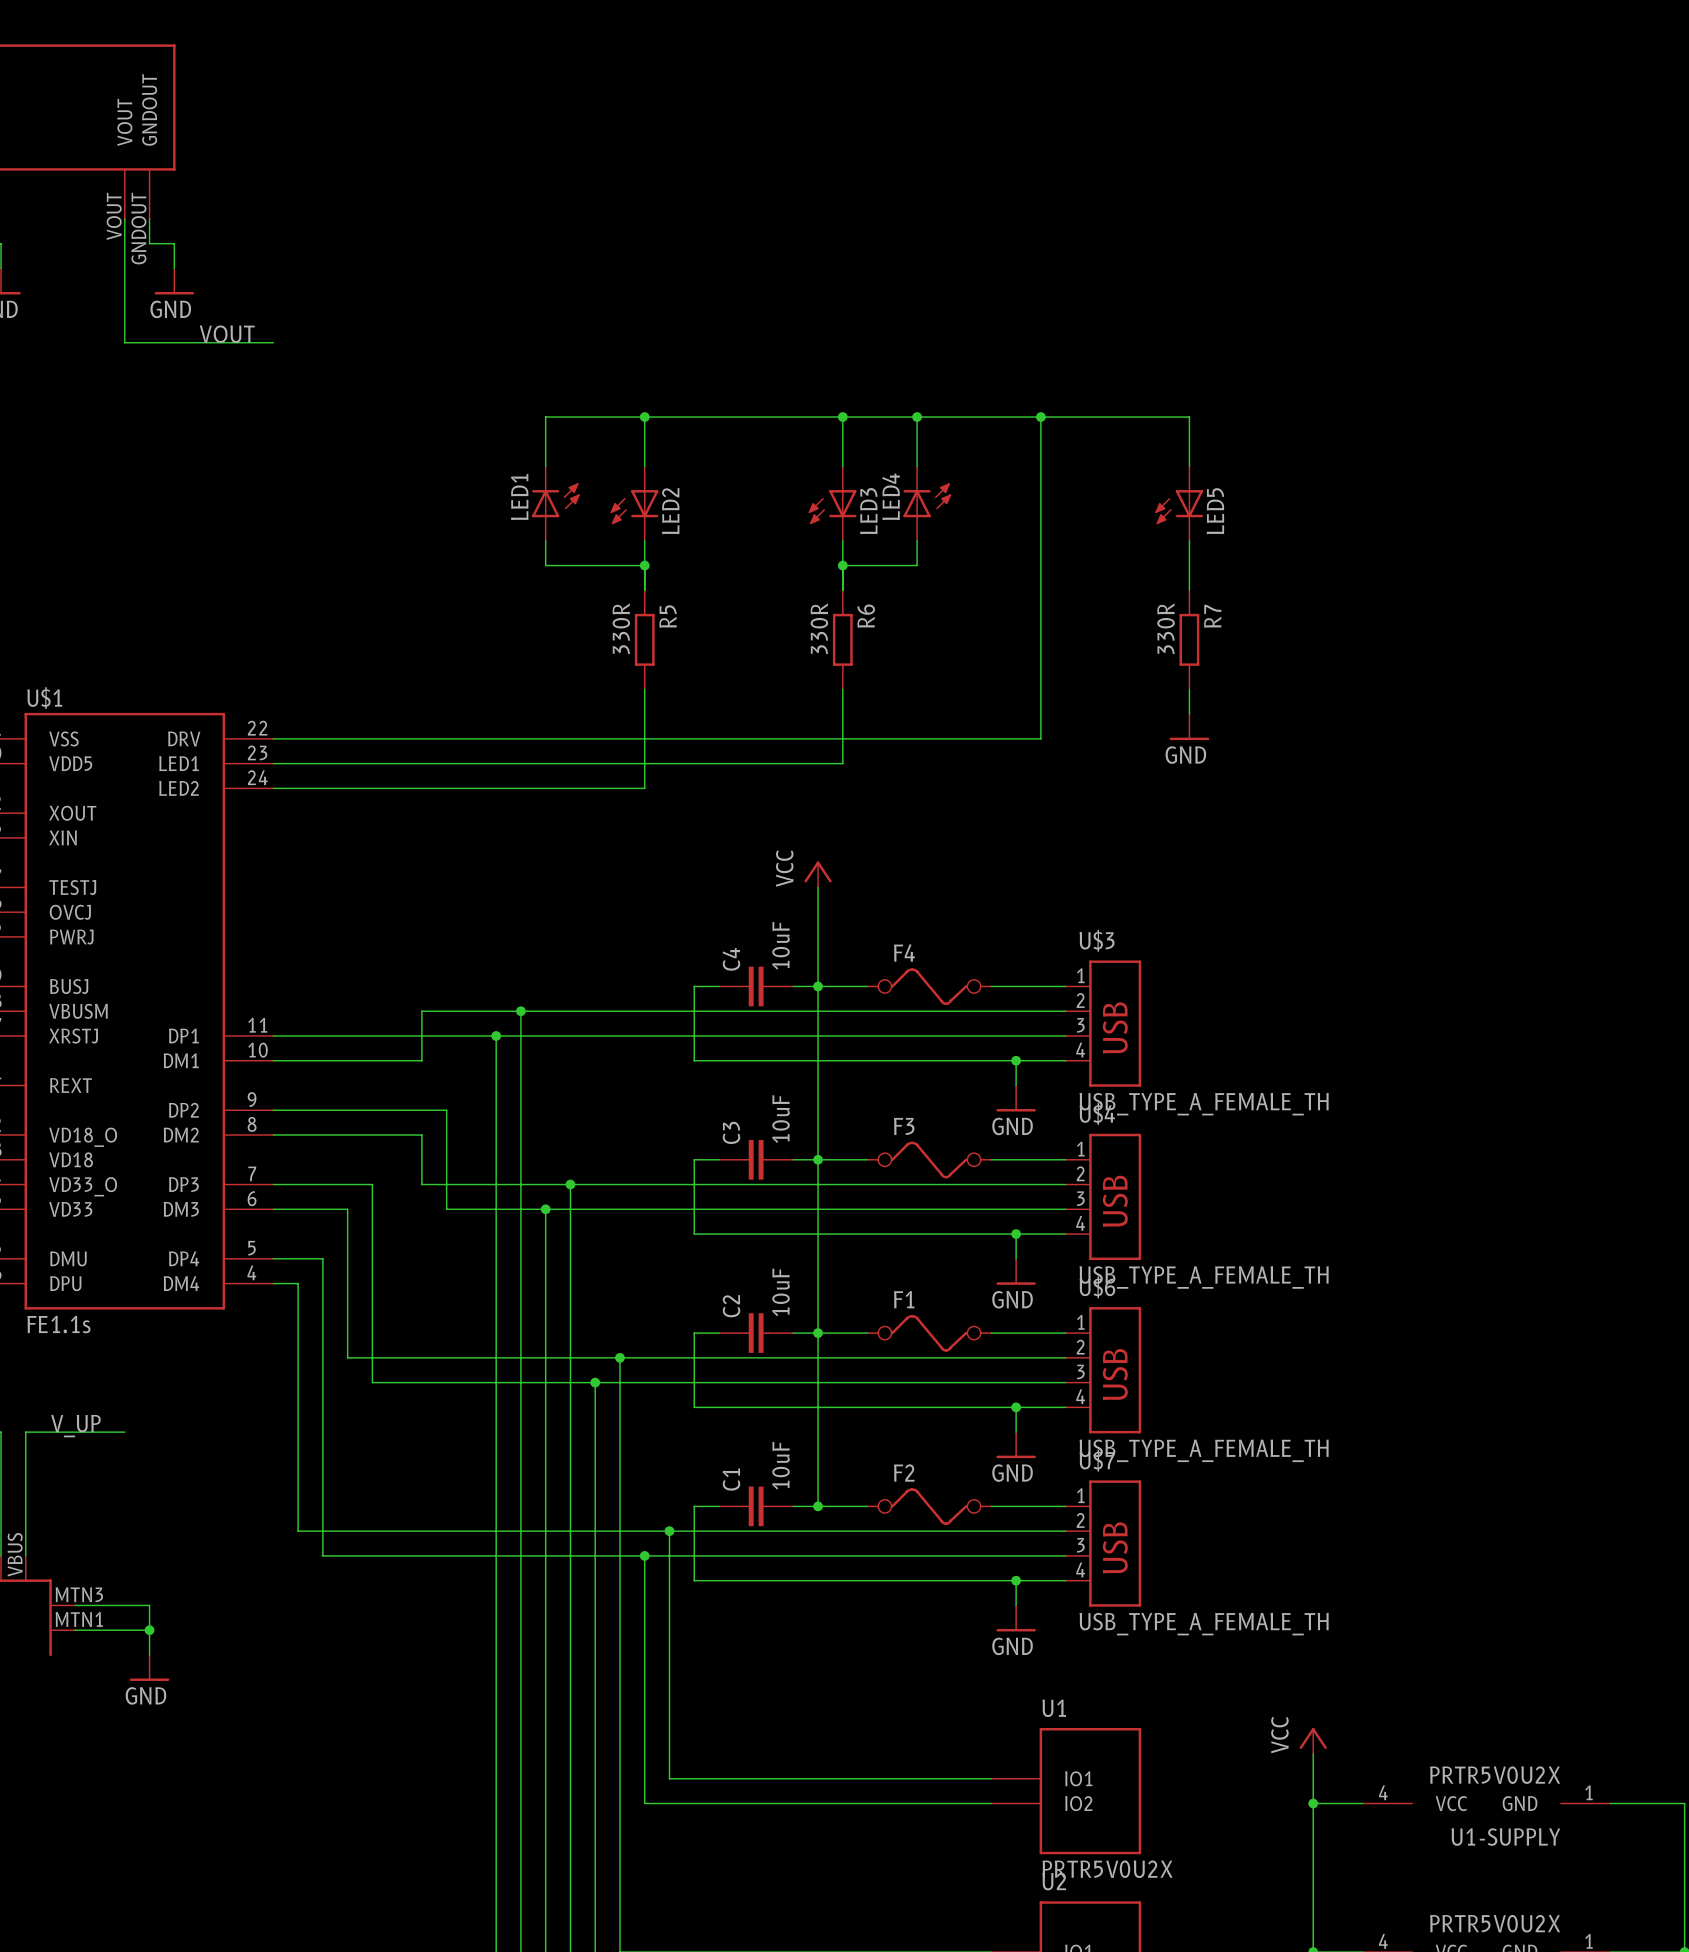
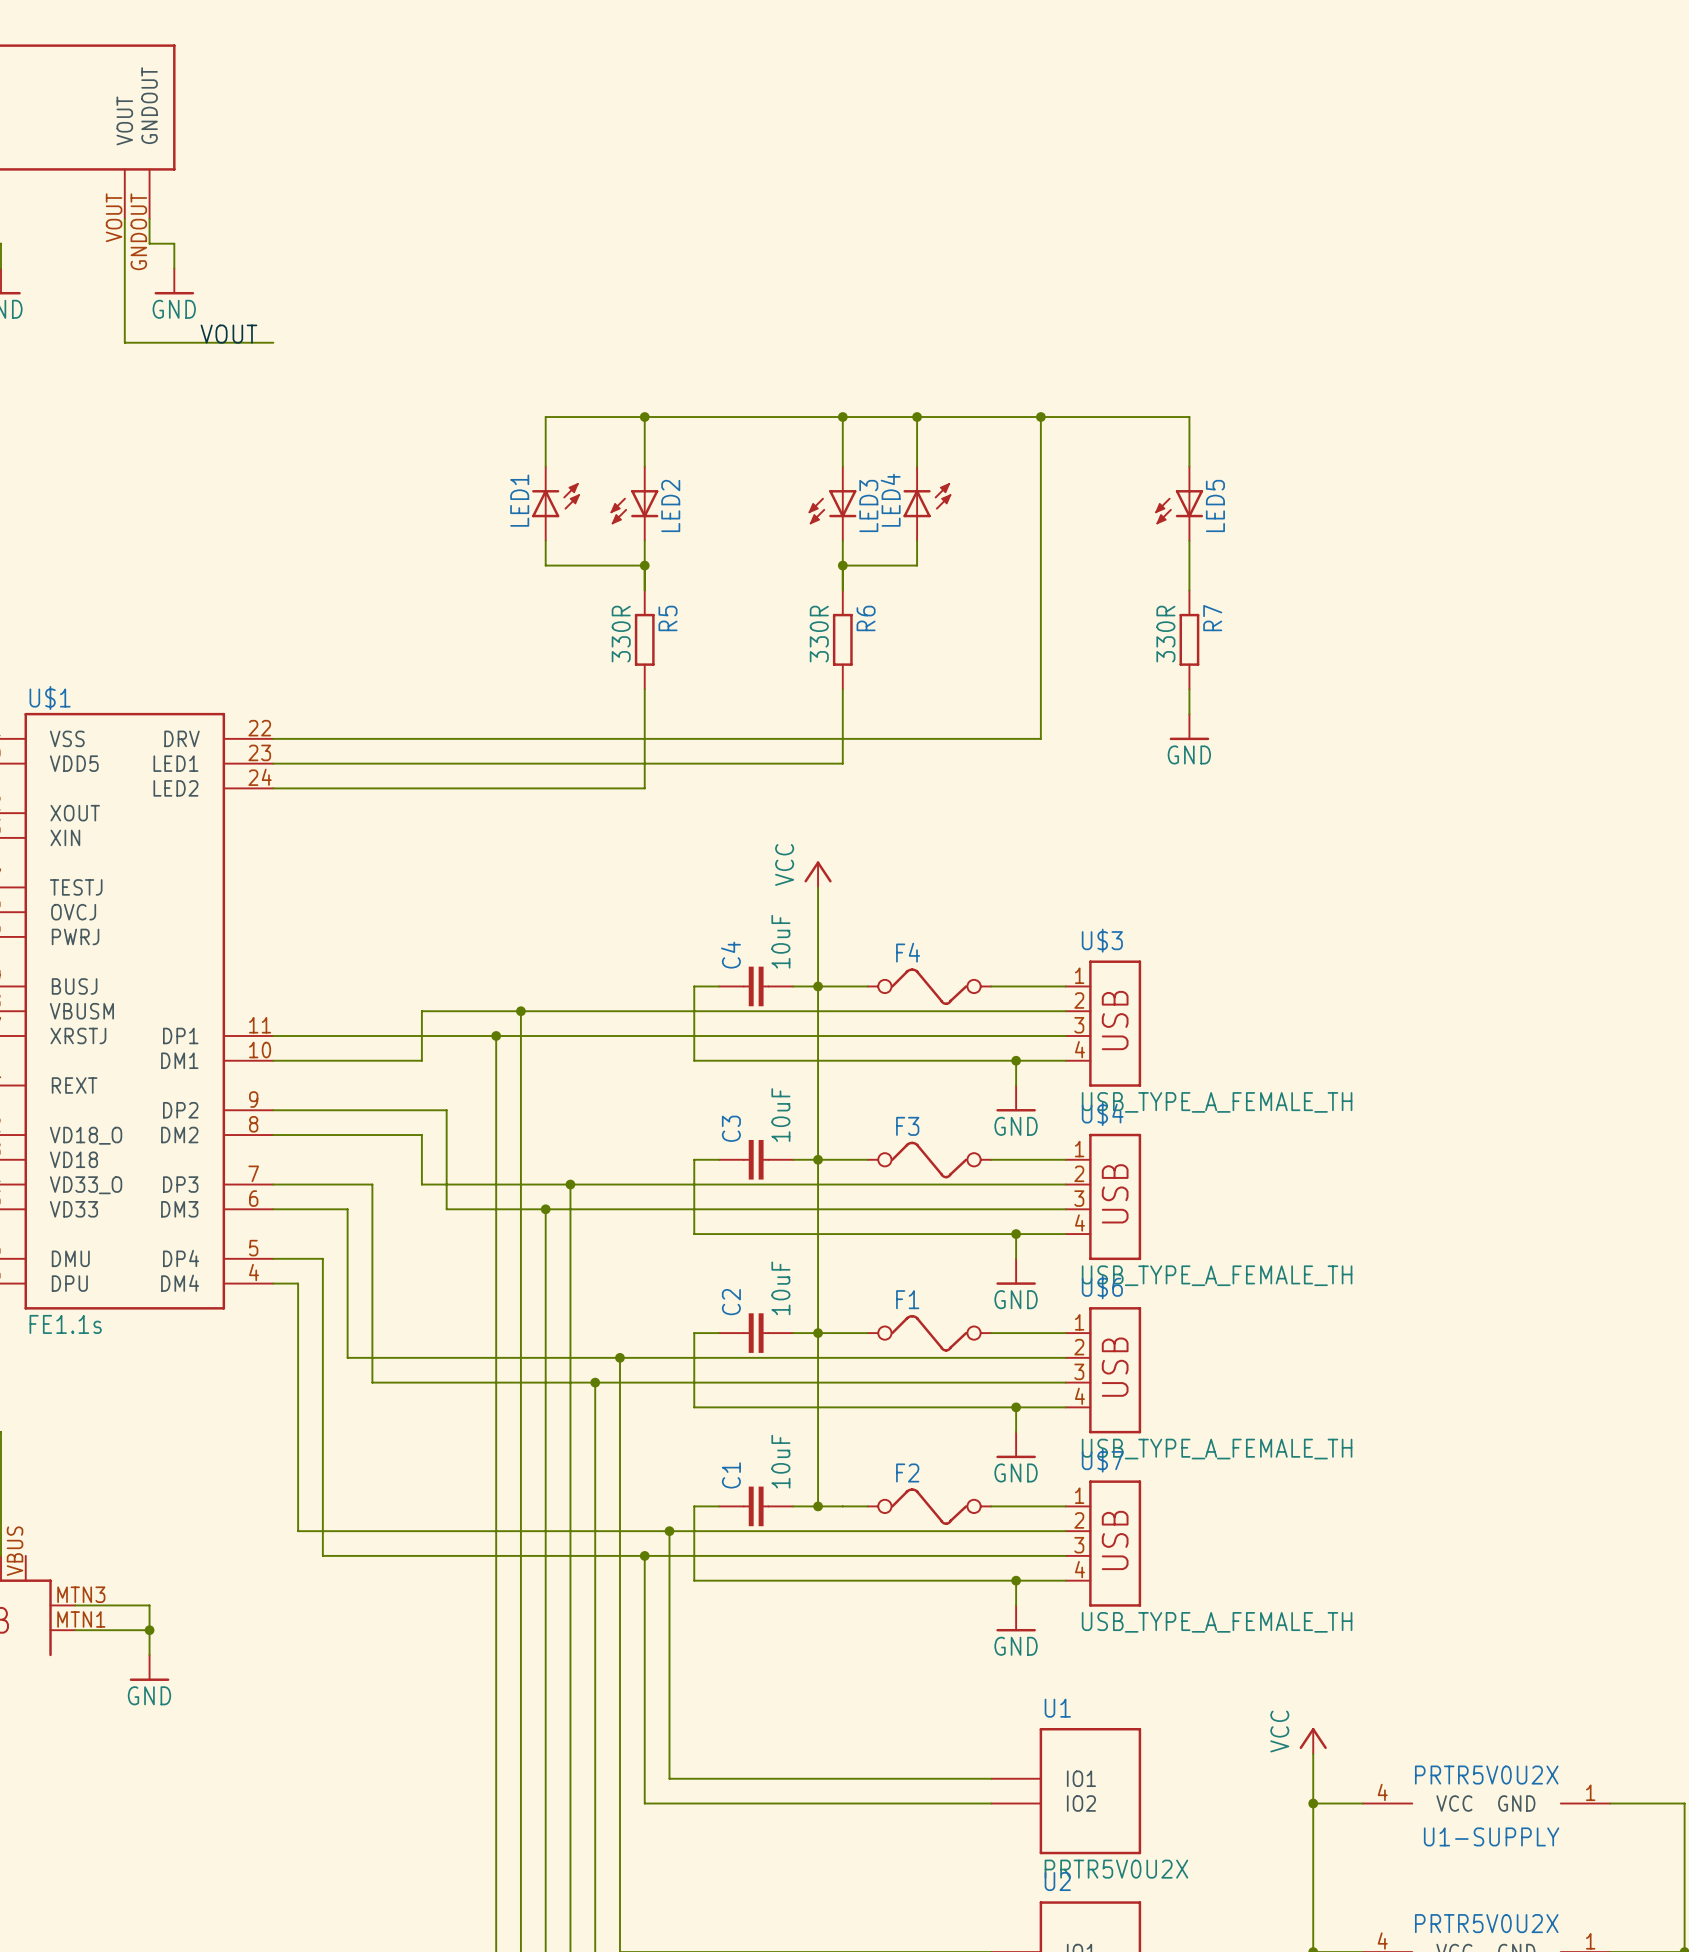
label: V_UP (75, 1426) -> none
wire: (124, 1432) (25, 1432) (25, 1555) -> none

